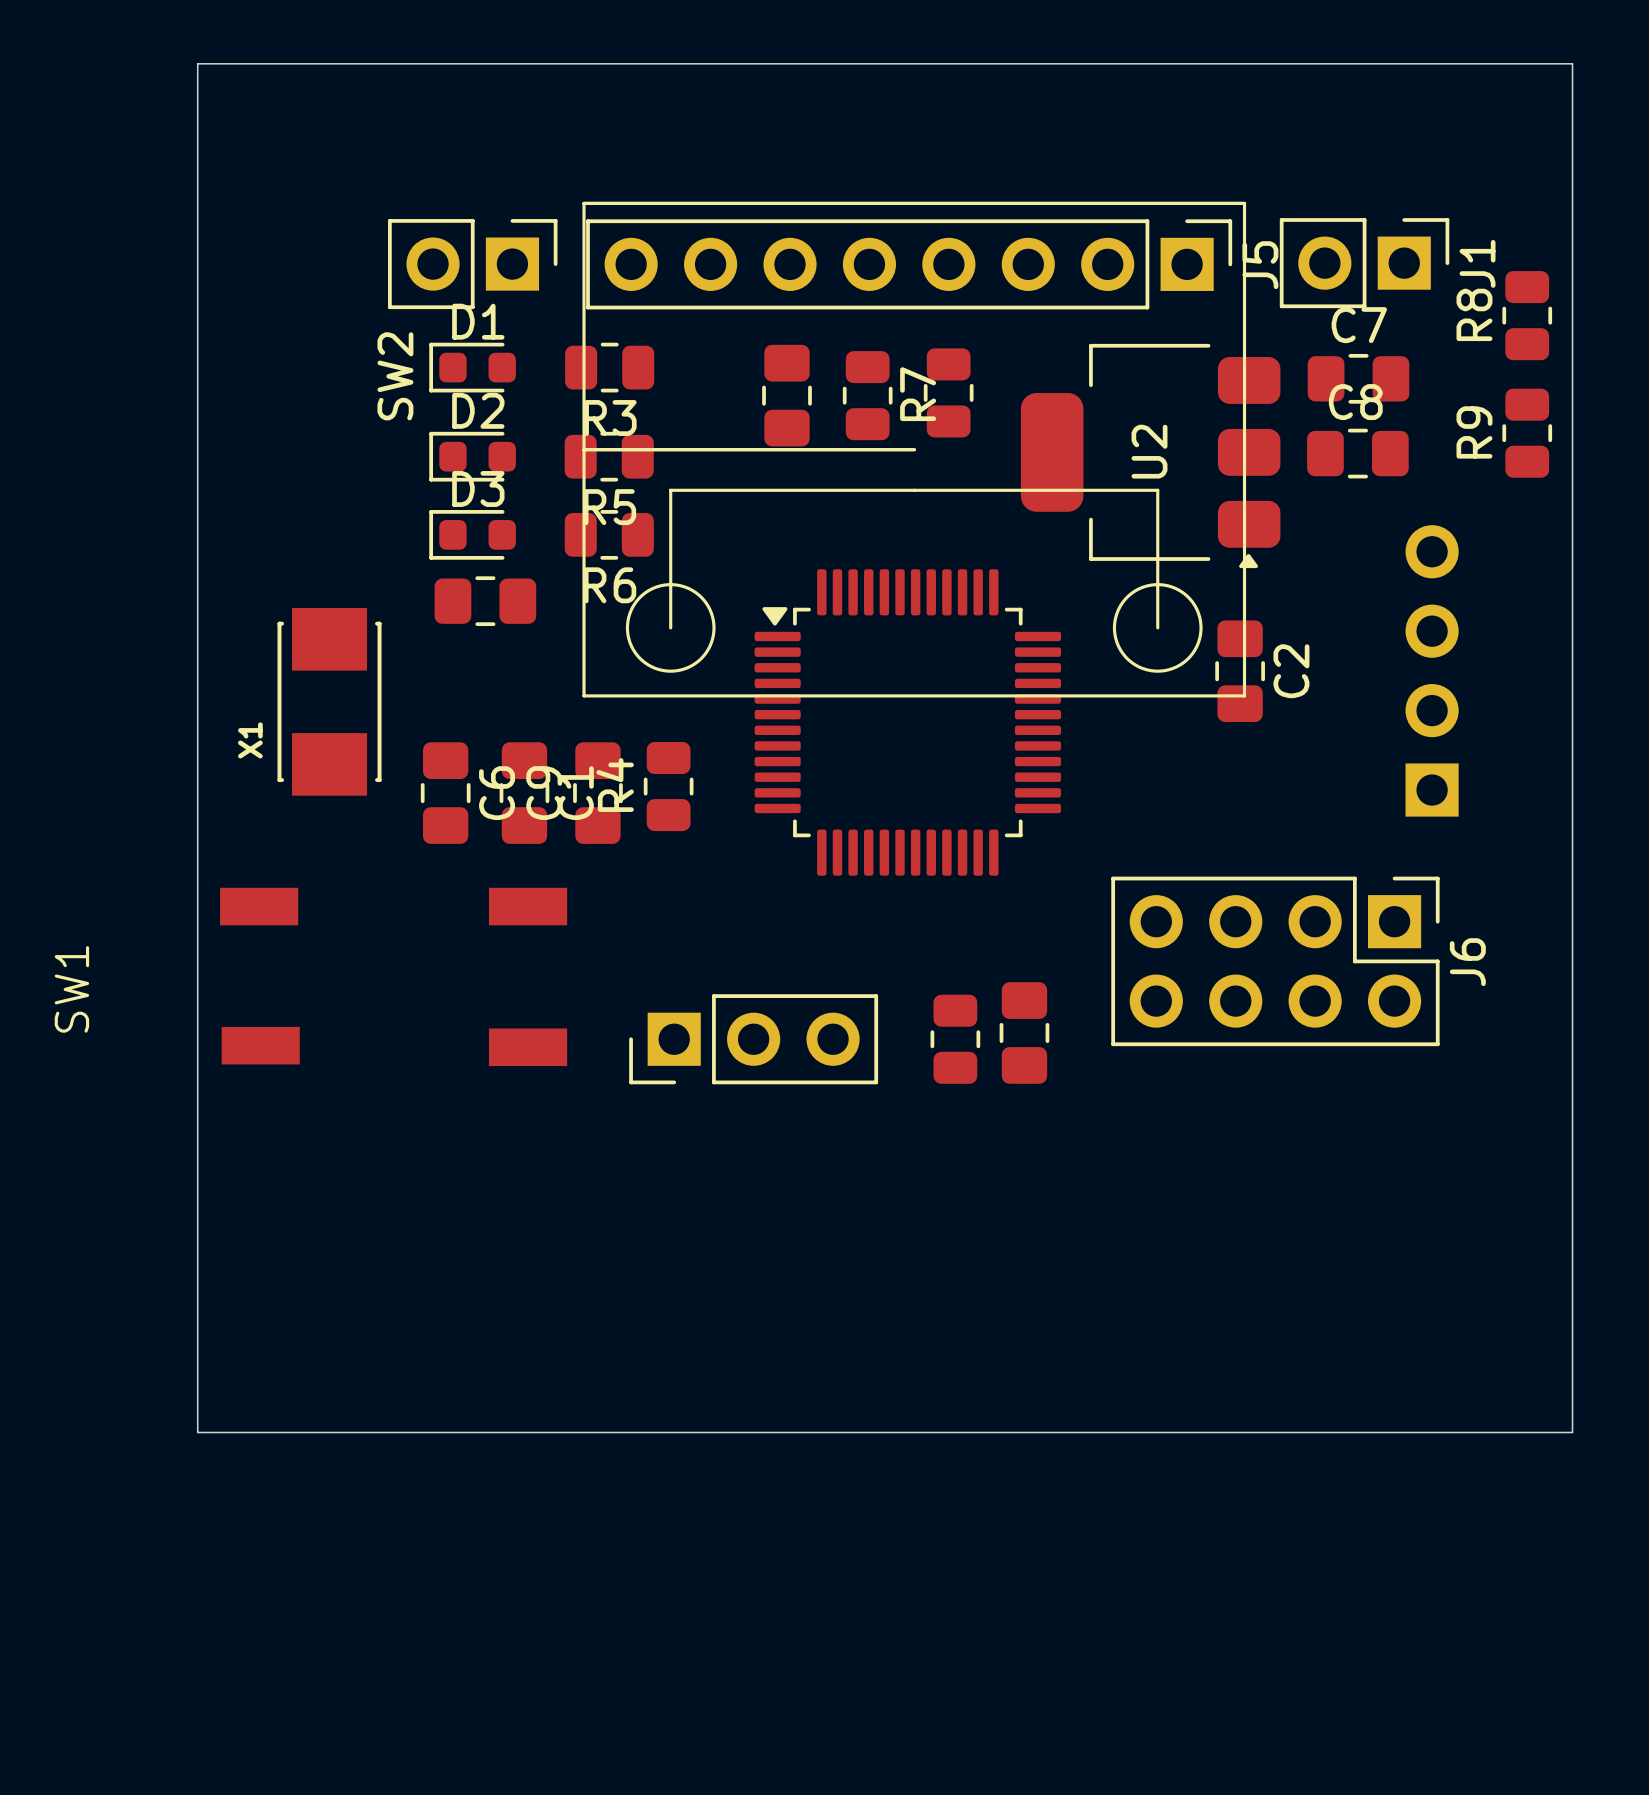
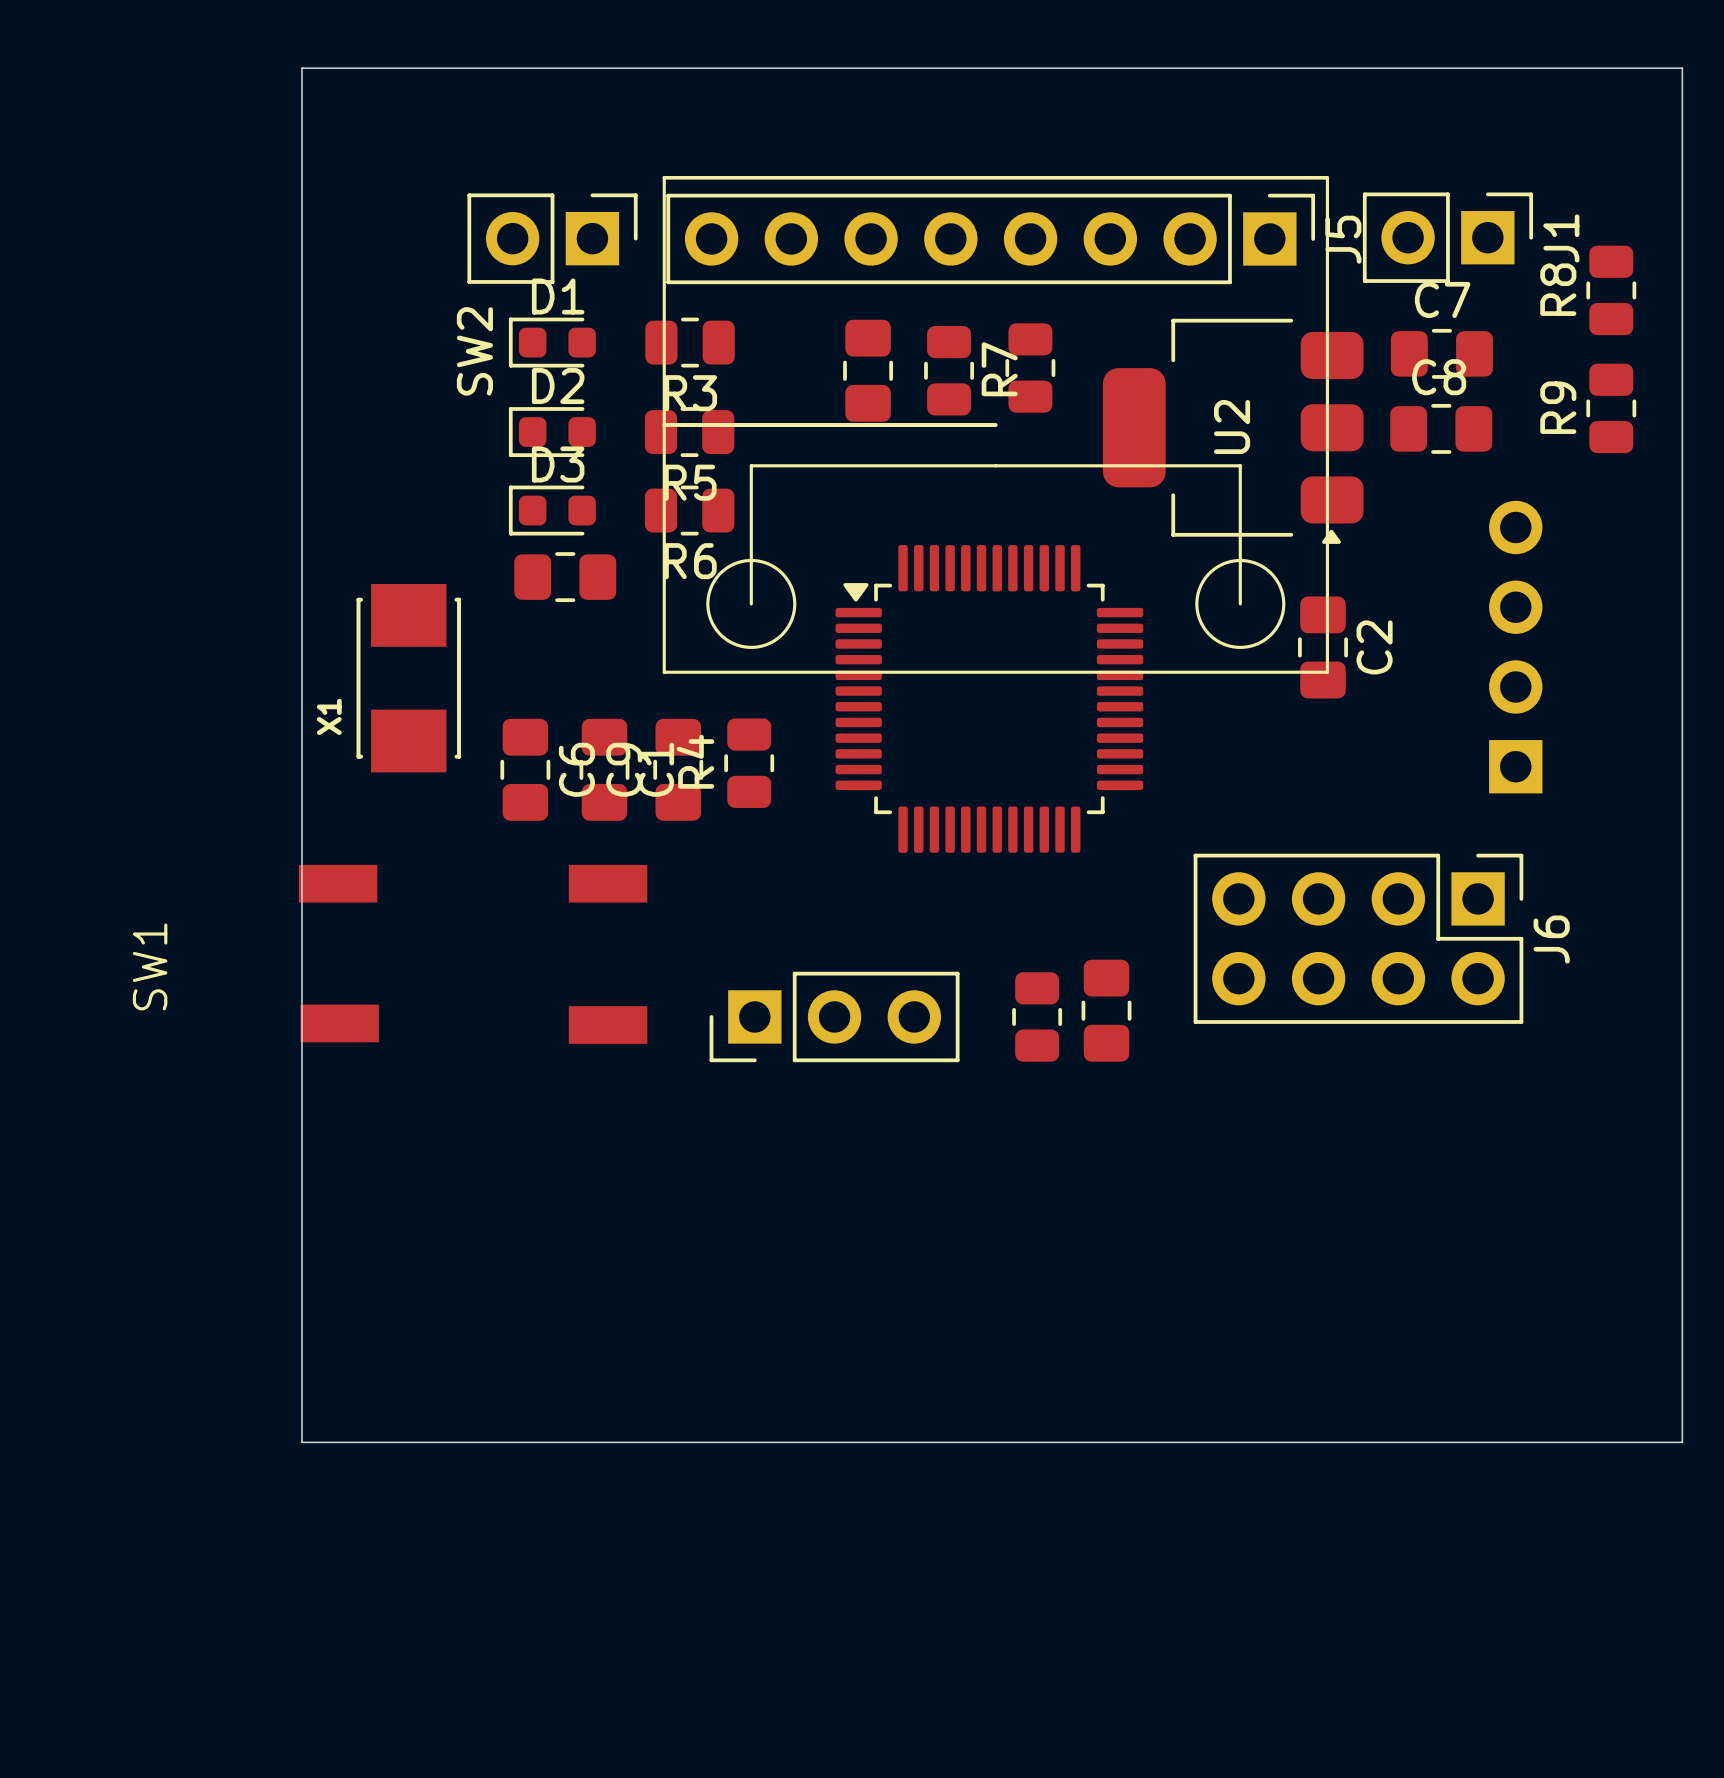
board edge: (197, 63) (1572, 63) (1572, 1432) (197, 1432) (197, 63) -> (301, 68) (301, 1442) (1682, 1442) (1682, 68) (301, 68)

